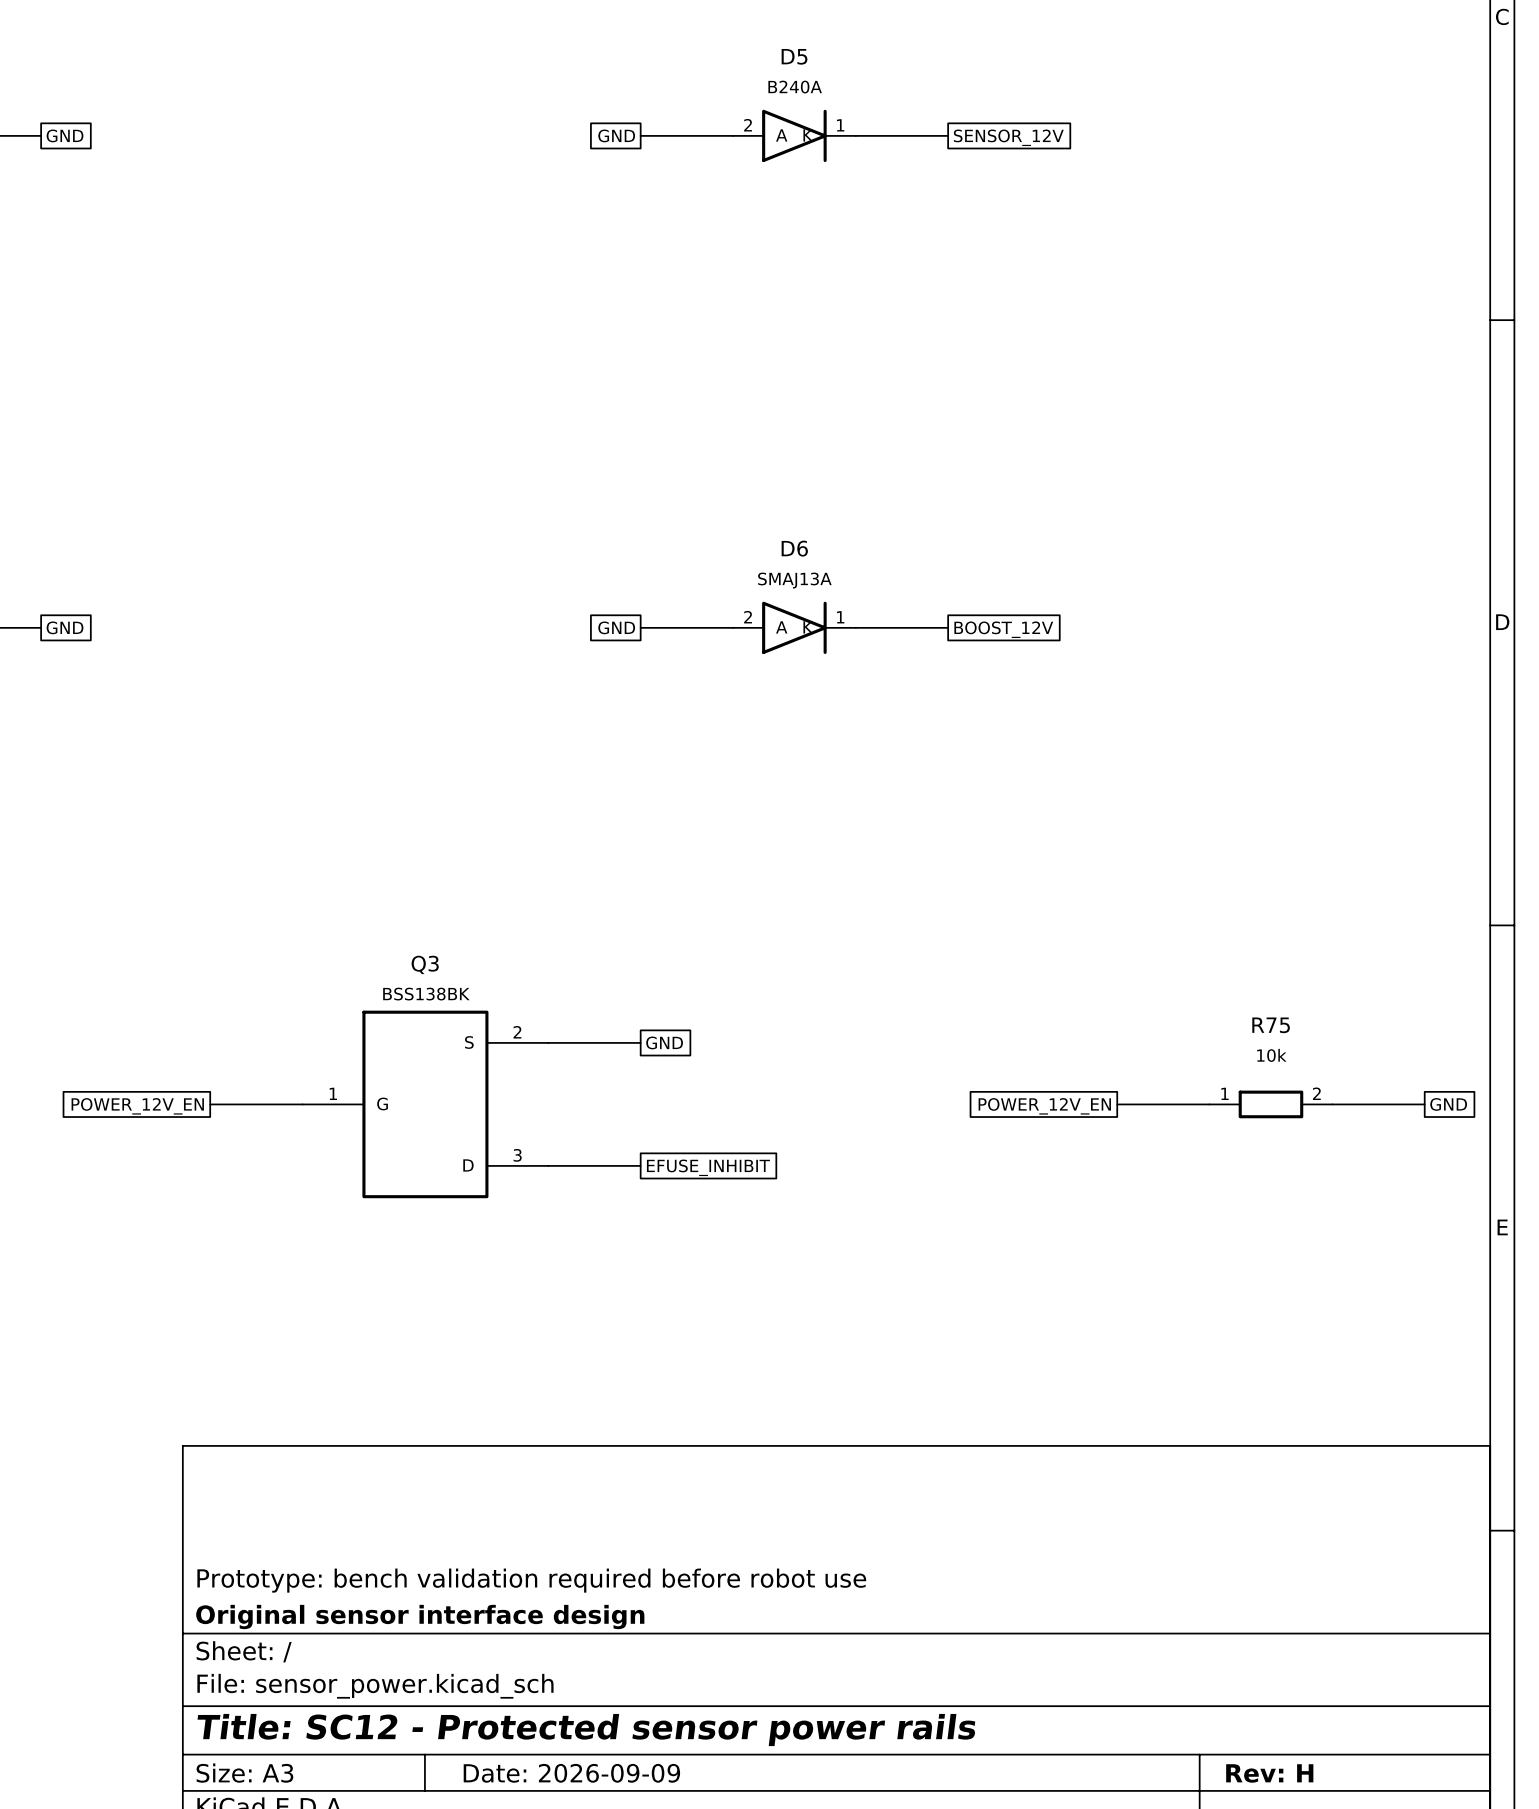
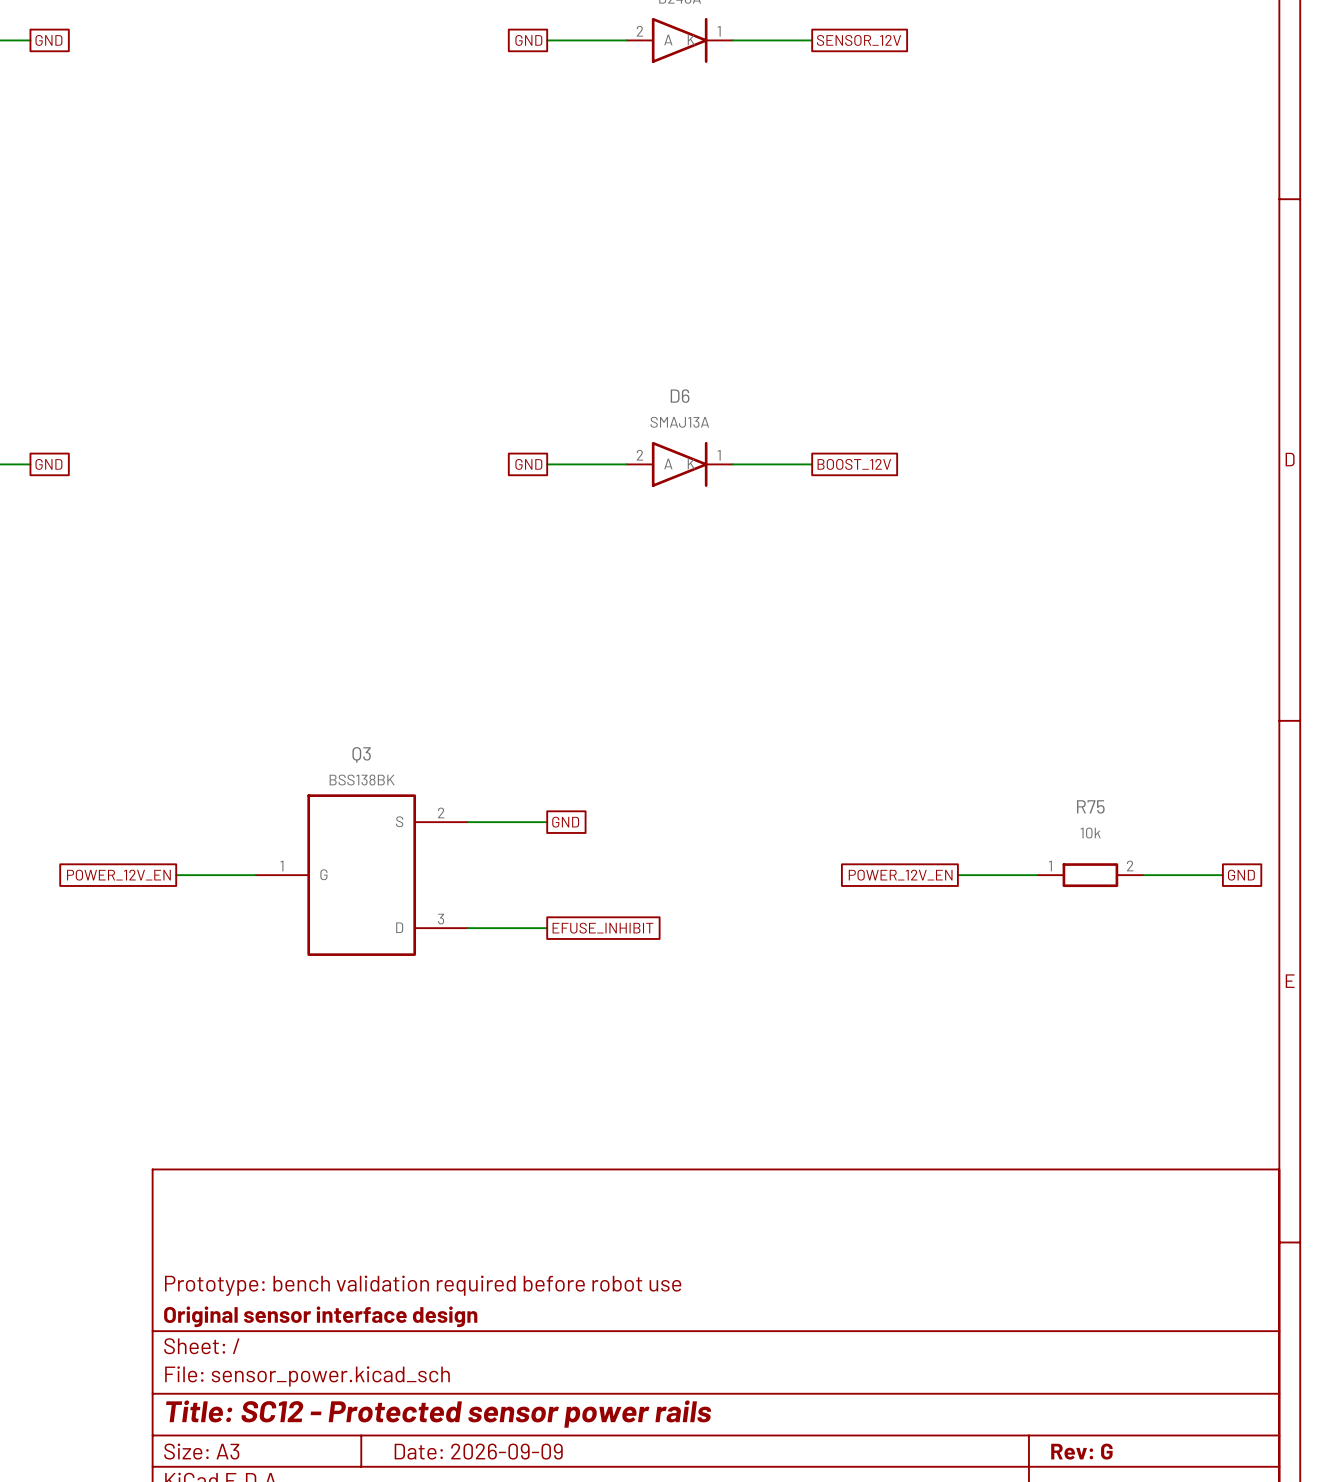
title block: Rev: H (1269, 1773) -> Rev: G (1081, 1451)

